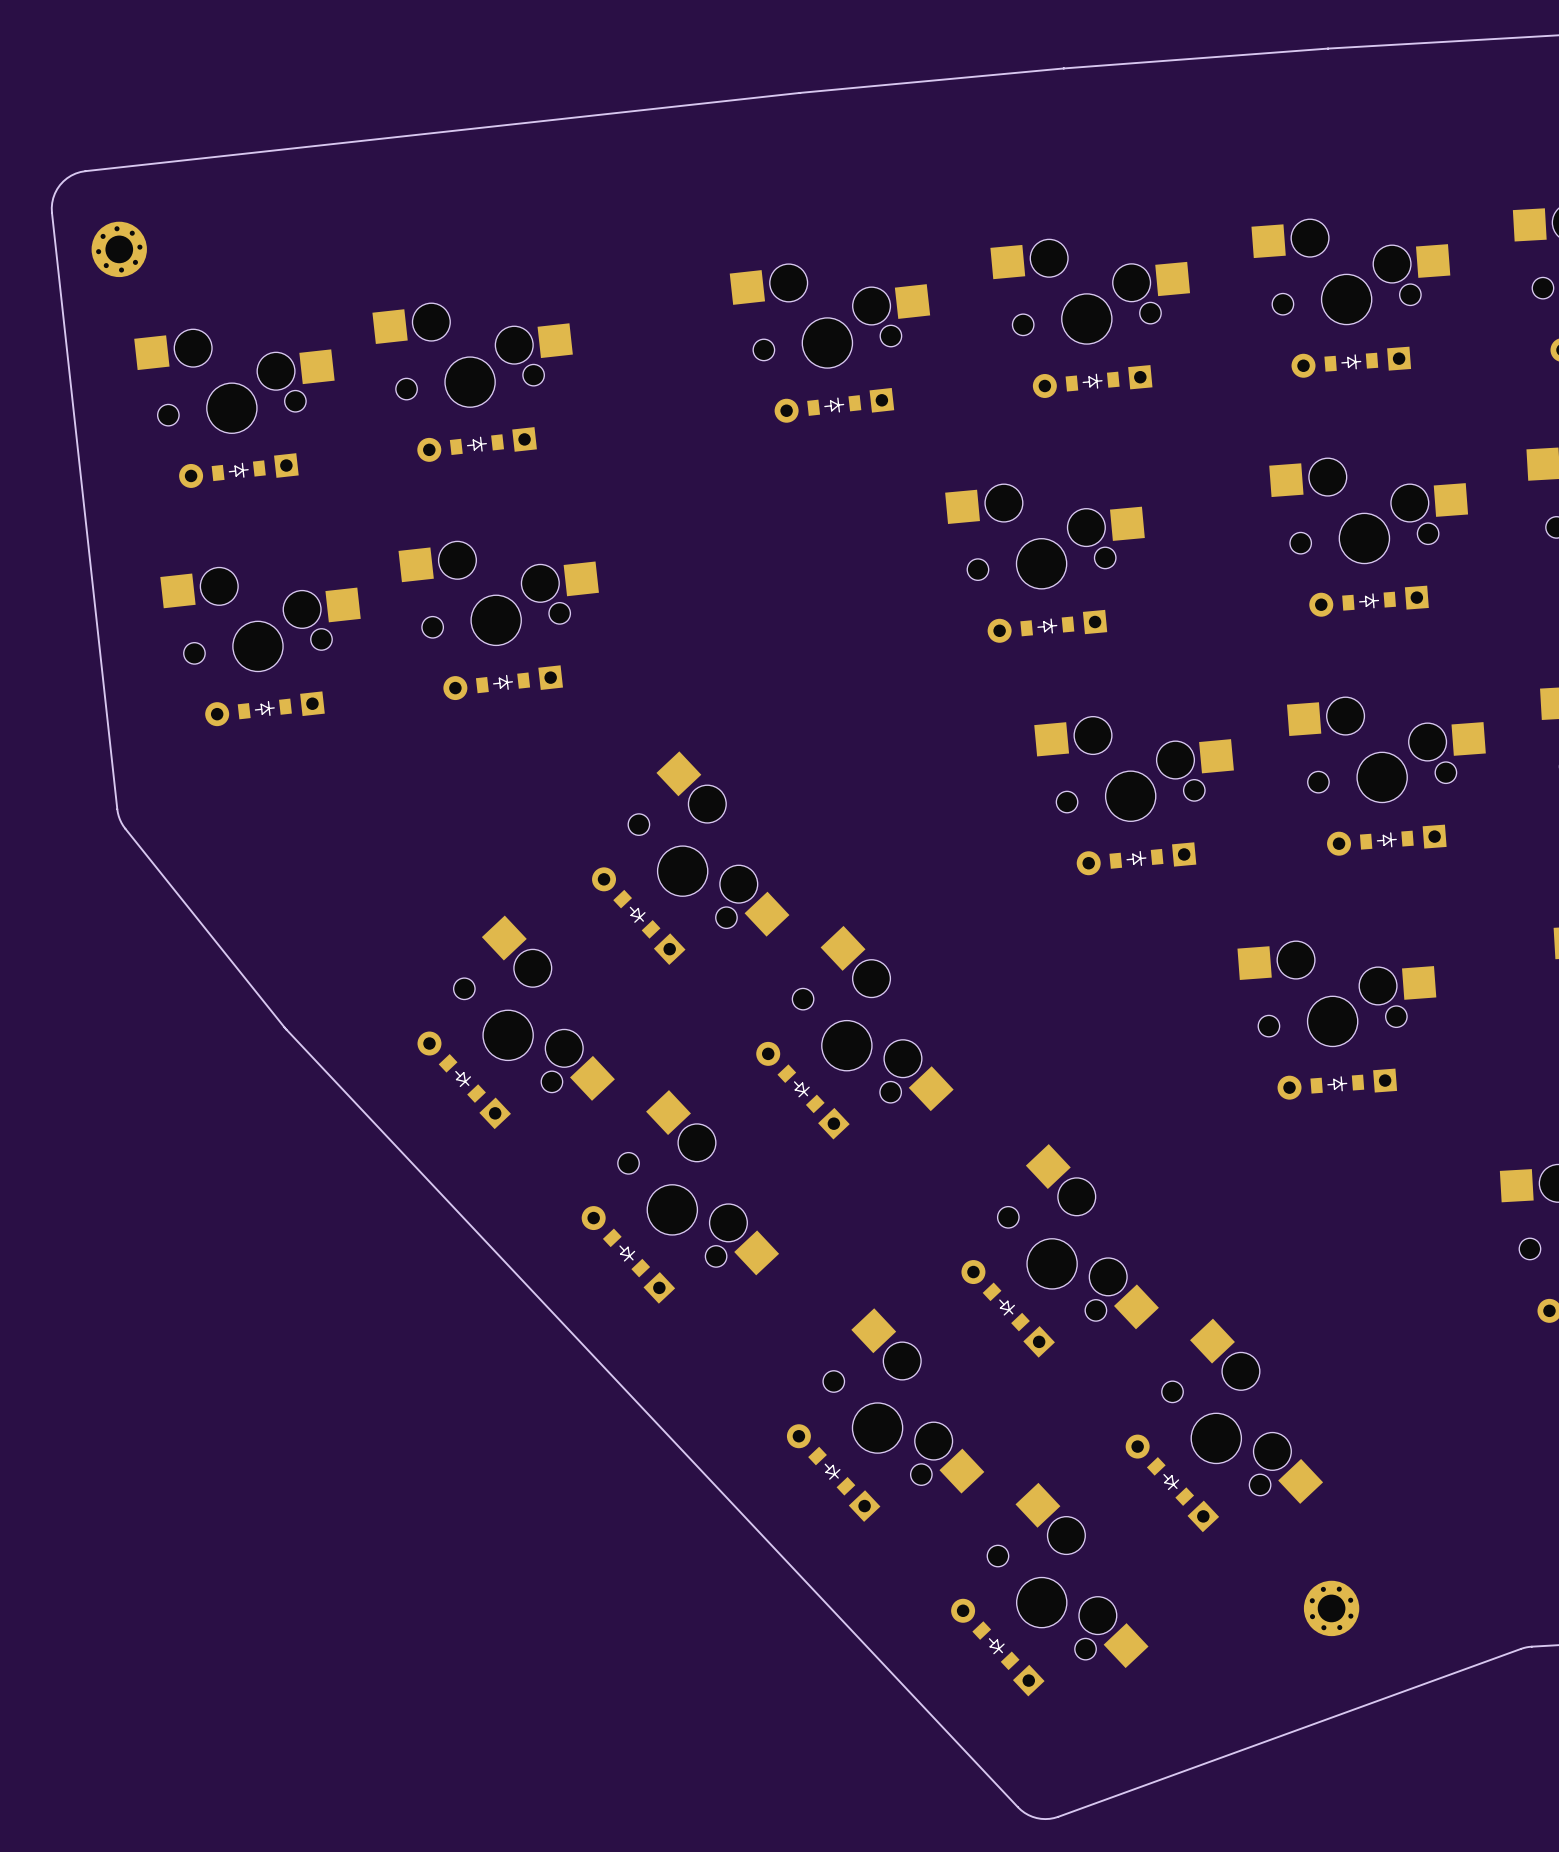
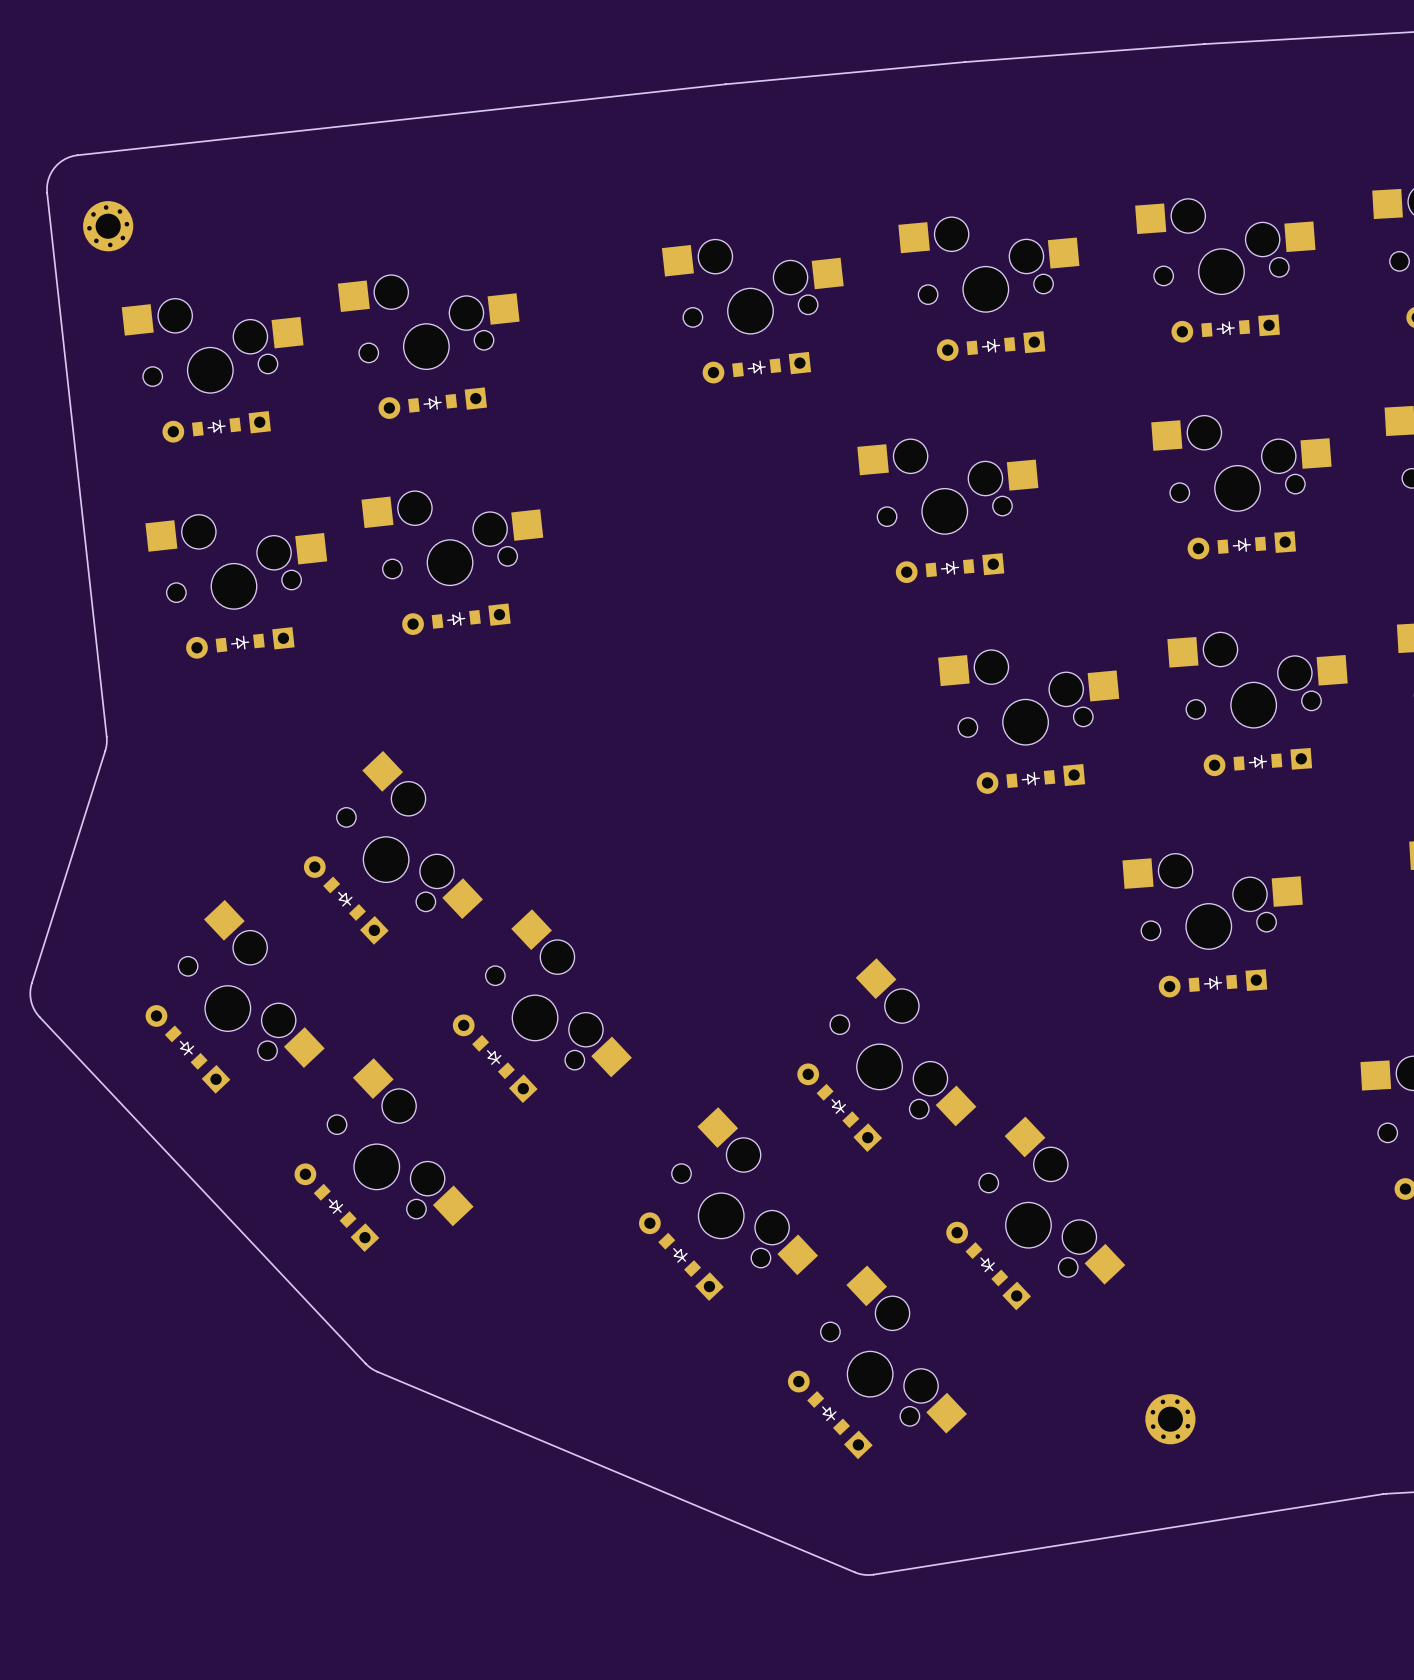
board edge: (117, 809) (119, 819) (125, 828) (286, 1029) (1024, 1812) (1041, 1818) (1058, 1816) (1521, 1648) (1531, 1646) -> (106, 734) (105, 750) (31, 983) (30, 997) (33, 1008) (39, 1017) (365, 1363) (374, 1370) (864, 1574) (1389, 1493)
part: (708, 844) -> none
part: (638, 916) -> none
part: none -> (409, 834)
part: none -> (346, 900)
part: (534, 1008) -> none
part: (873, 1018) -> none
part: (464, 1080) -> none
part: none -> (251, 983)
part: (802, 1090) -> none
part: none -> (558, 993)
part: none -> (903, 1042)
part: none -> (188, 1049)
part: none -> (495, 1058)
part: (698, 1182) -> none
part: none -> (839, 1107)
part: (1078, 1236) -> none
part: (628, 1254) -> none
part: none -> (400, 1142)
part: (1008, 1308) -> none
part: none -> (744, 1191)
part: none -> (1052, 1200)
part: none -> (336, 1207)
part: none -> (681, 1256)
part: none -> (988, 1266)
part: (903, 1400) -> none
part: (1242, 1411) -> none
part: (833, 1473) -> none
part: (1172, 1483) -> none
part: none -> (893, 1349)
part: none -> (830, 1414)
part: (1067, 1575) -> none
part position: (1331, 1608) -> (1170, 1419)
part: (997, 1647) -> none

